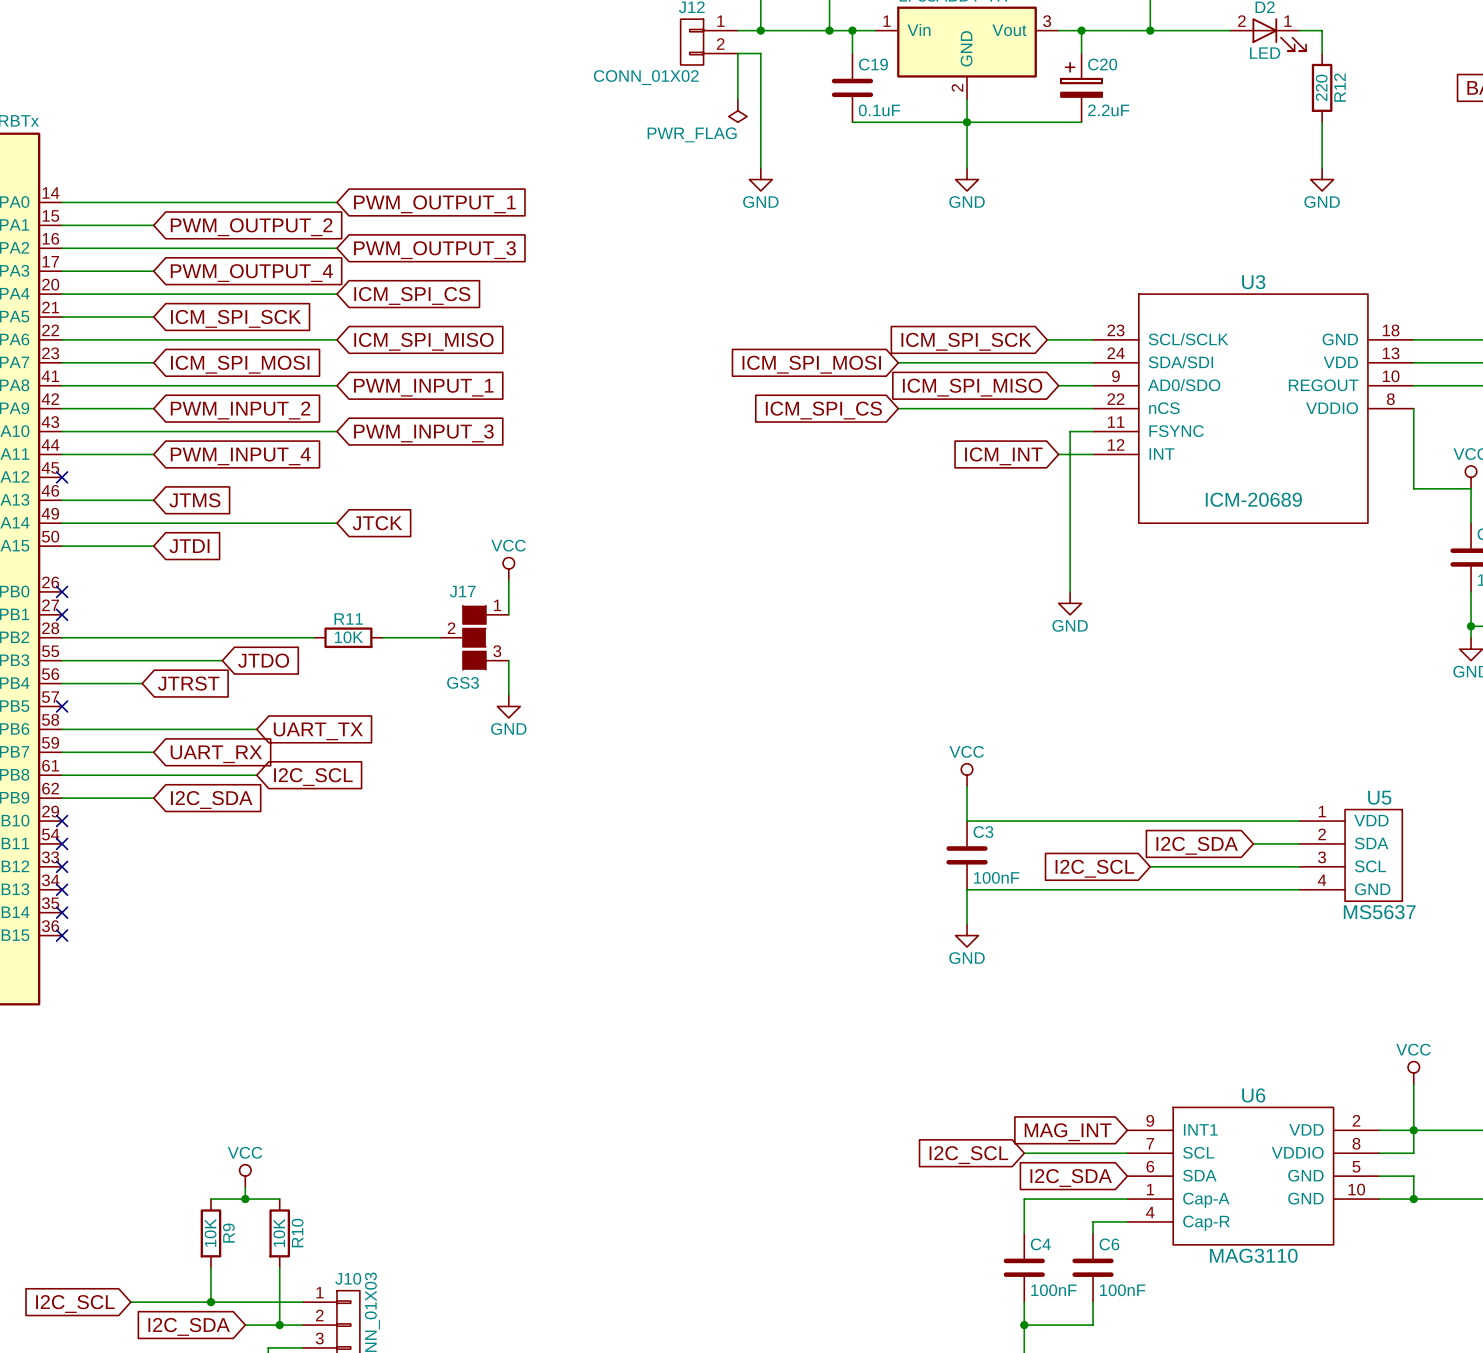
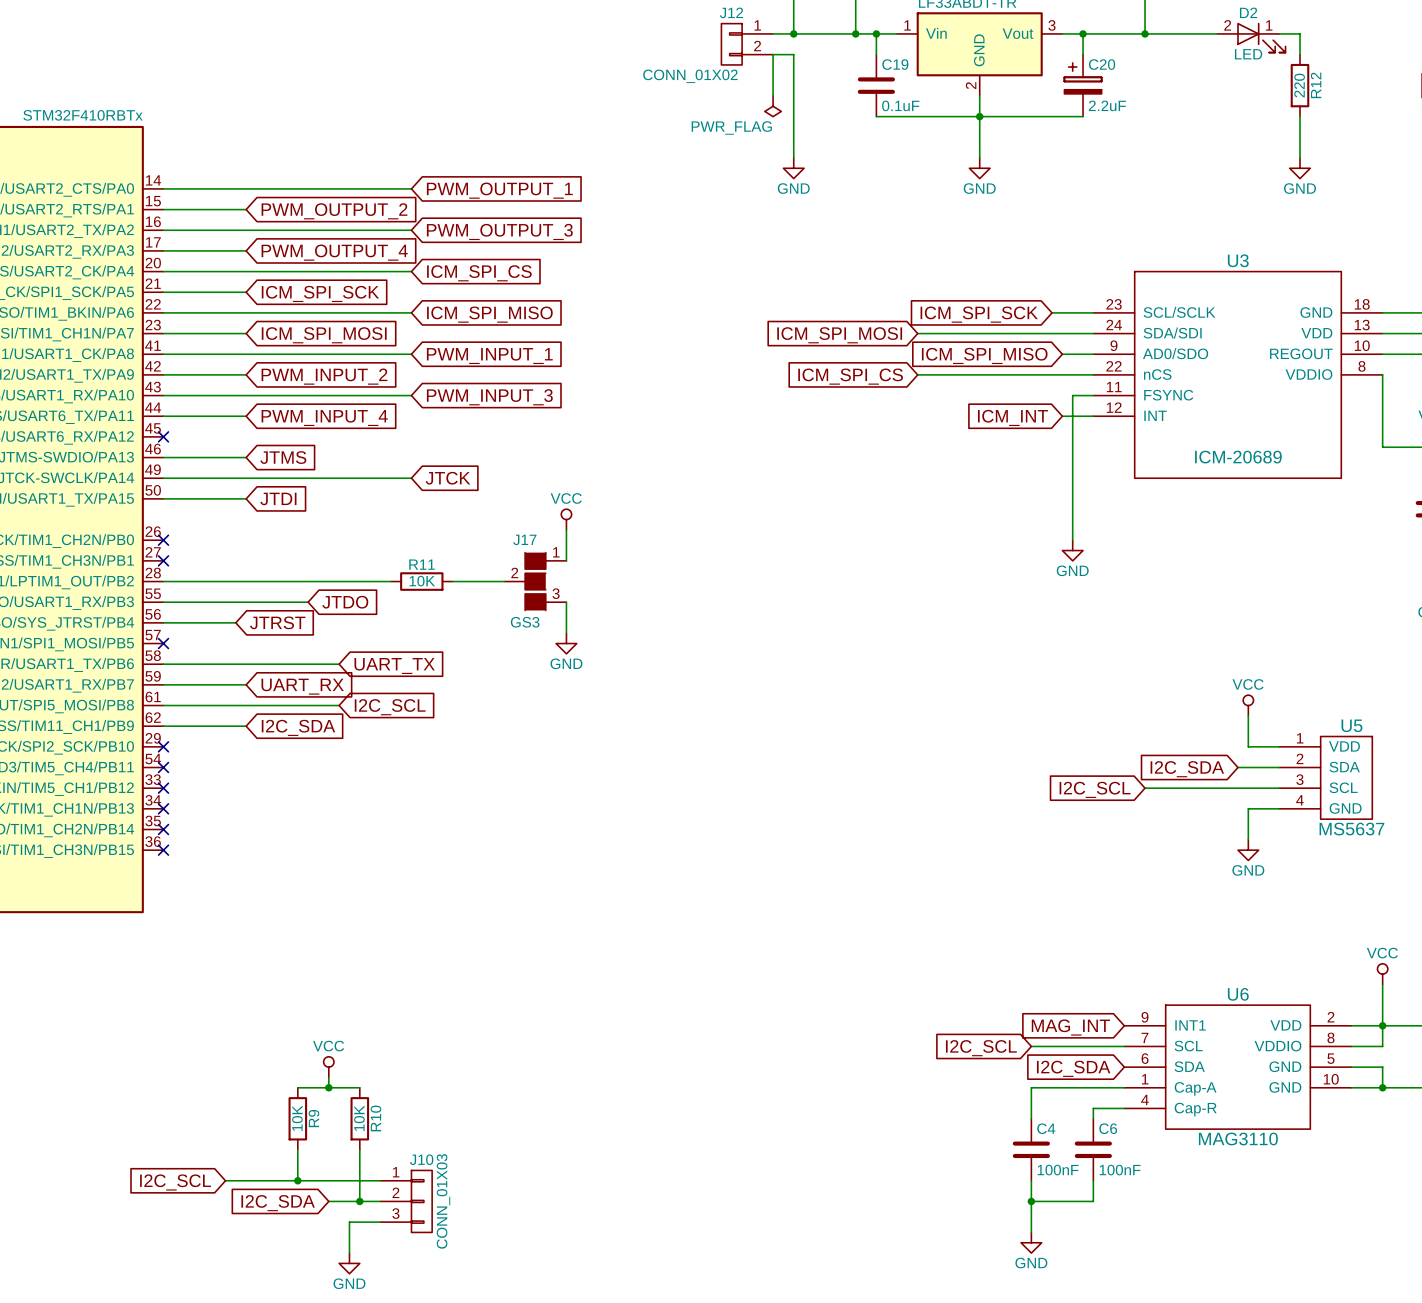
power symbol: VCC (967, 775) -> none
power symbol: none -> VCC (1248, 705)
wire: (967, 786) (967, 821) (1264, 821) -> (1248, 715) (1248, 746)
C3: 100nF (967, 855) -> none
wire: (1264, 889) (967, 889) (967, 924) -> (1248, 808) (1248, 839)
power symbol: GND (967, 935) -> none
power symbol: none -> GND (1248, 850)

